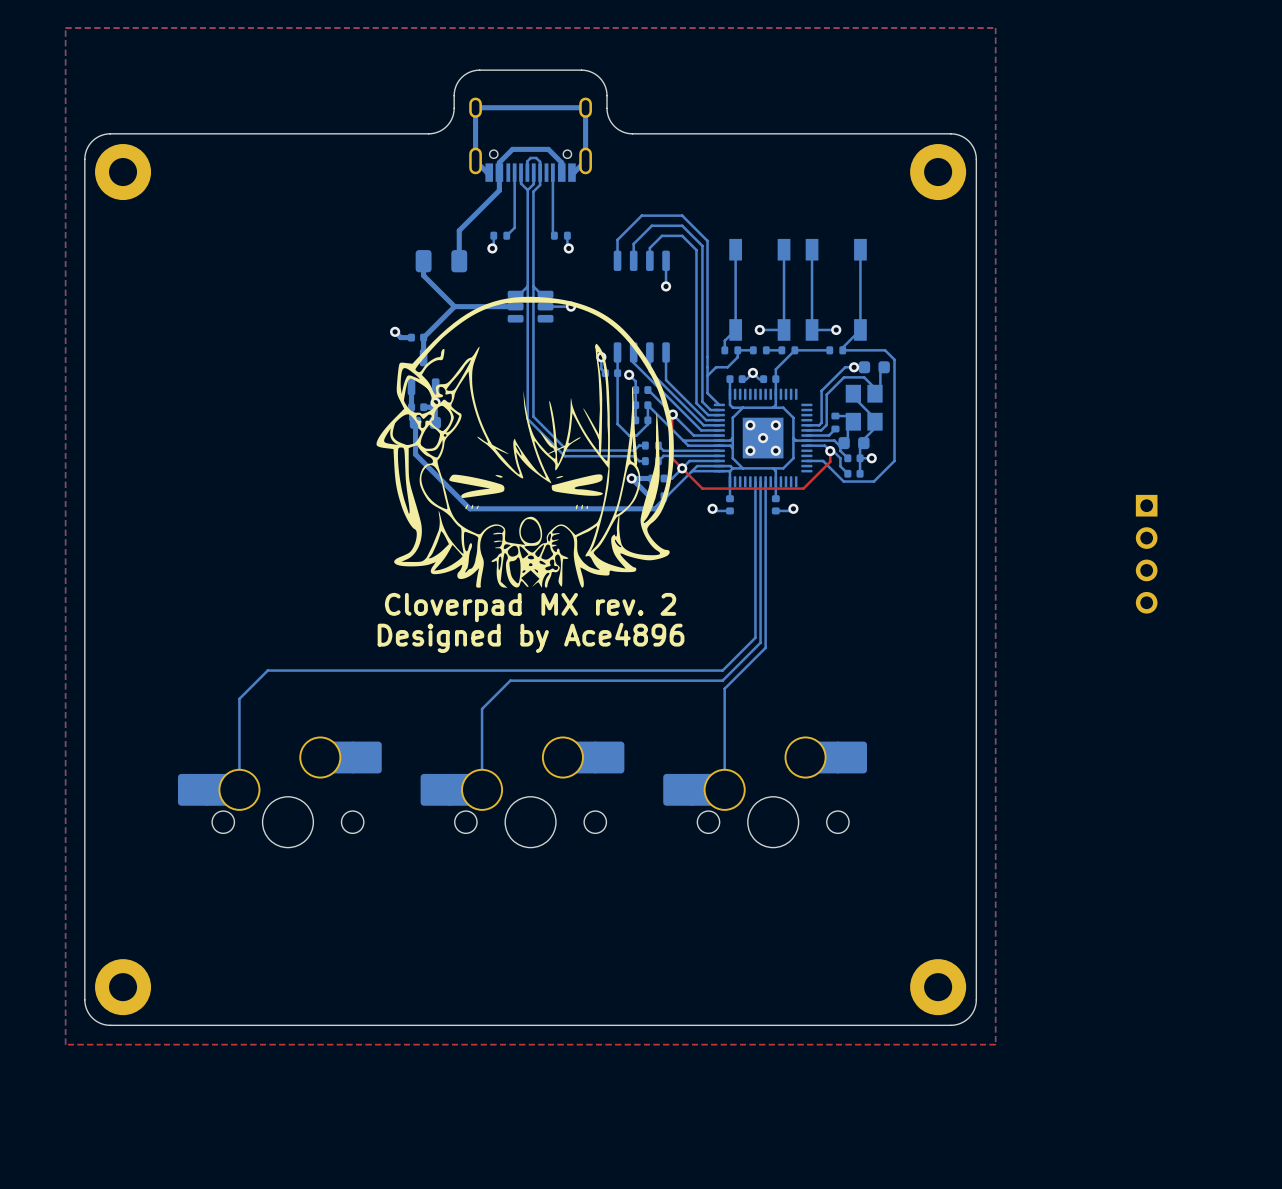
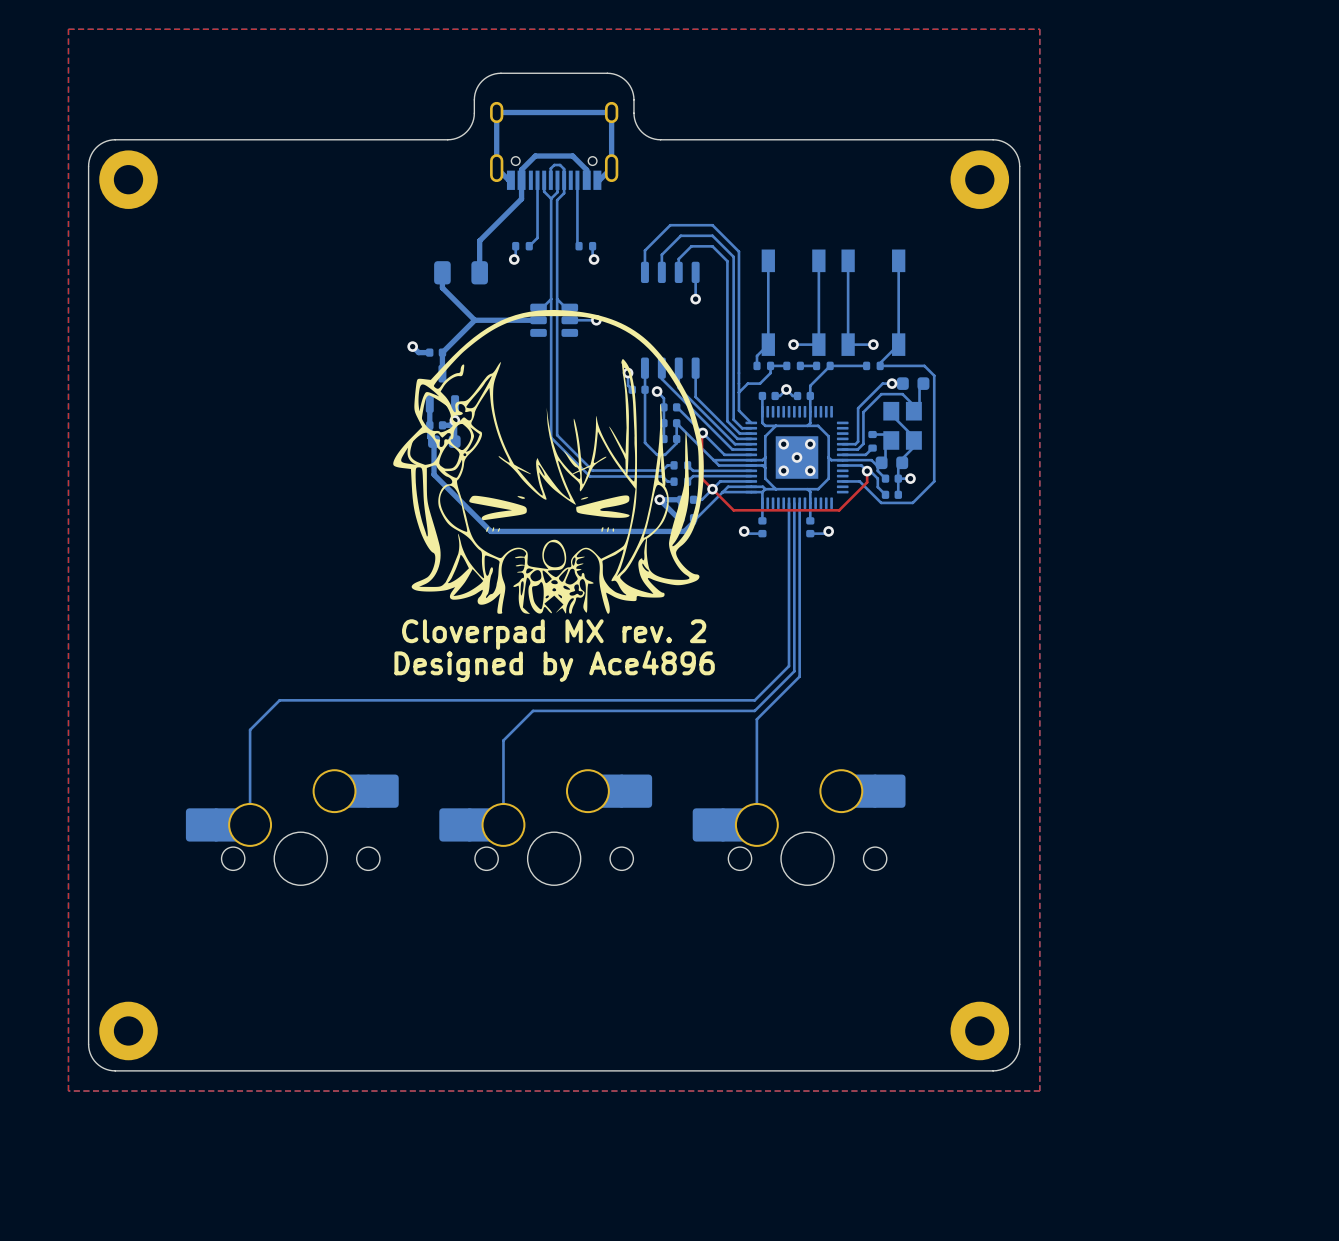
part: (1146, 554) -> none

